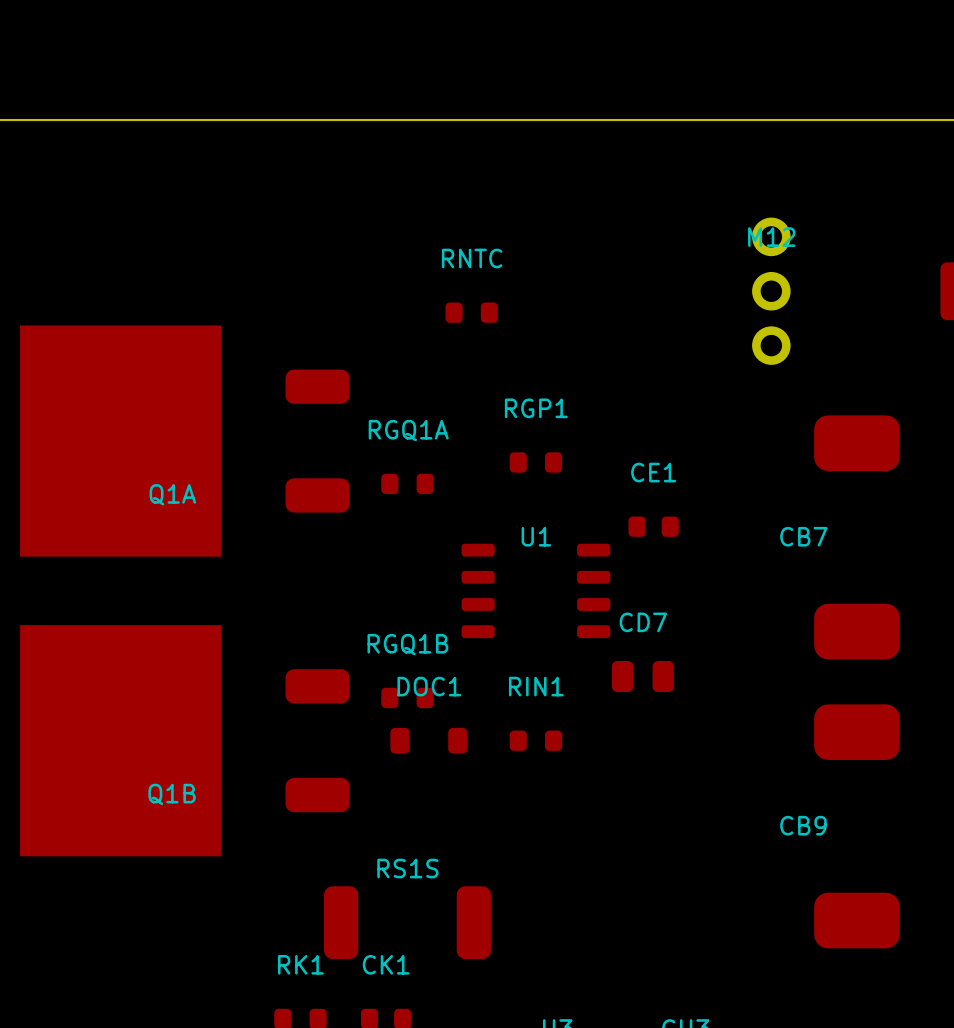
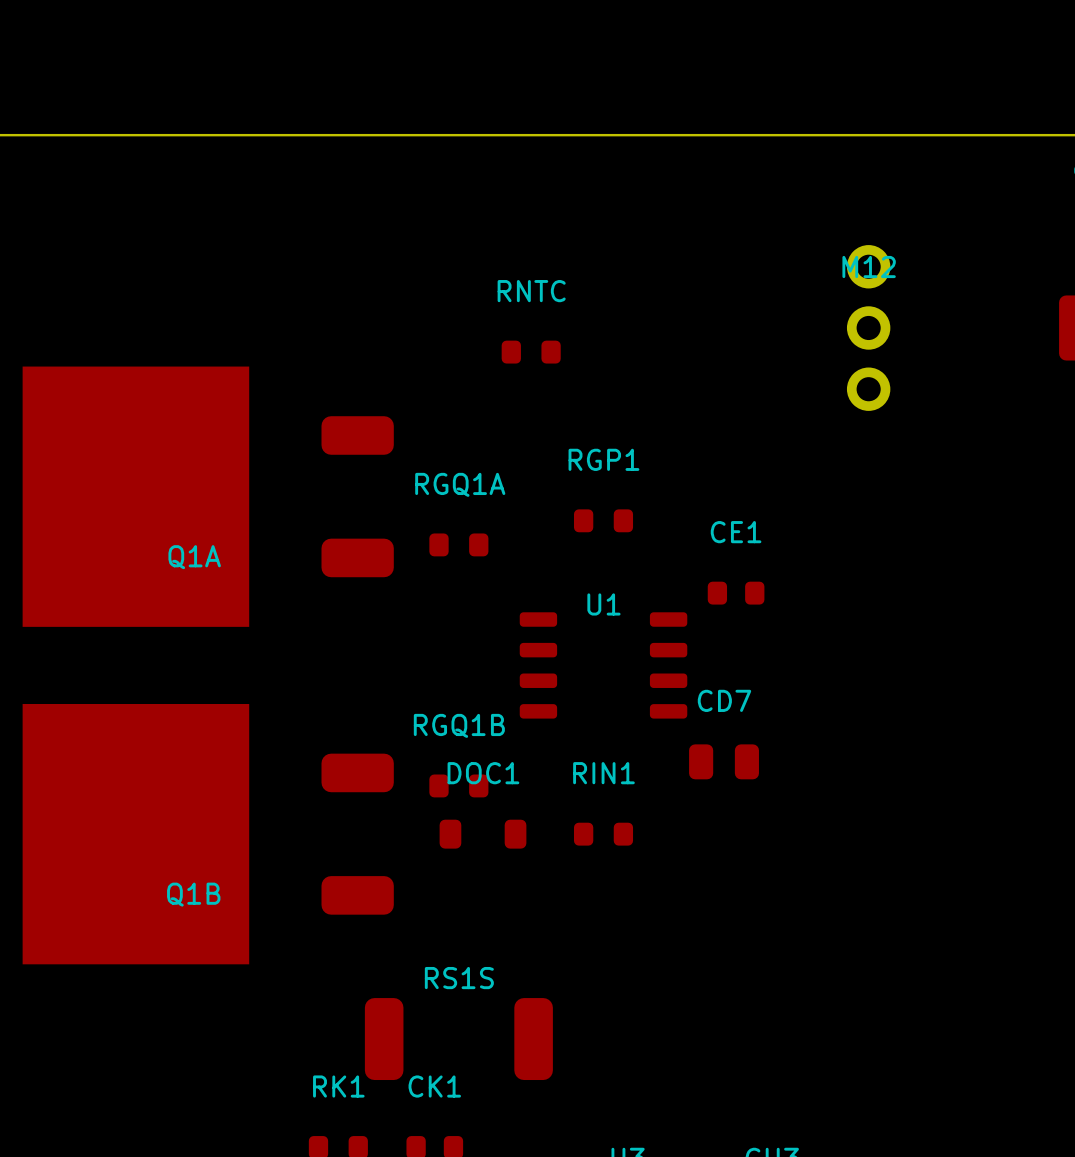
CB7: (856, 537) -> none
CB9: (856, 826) -> none

